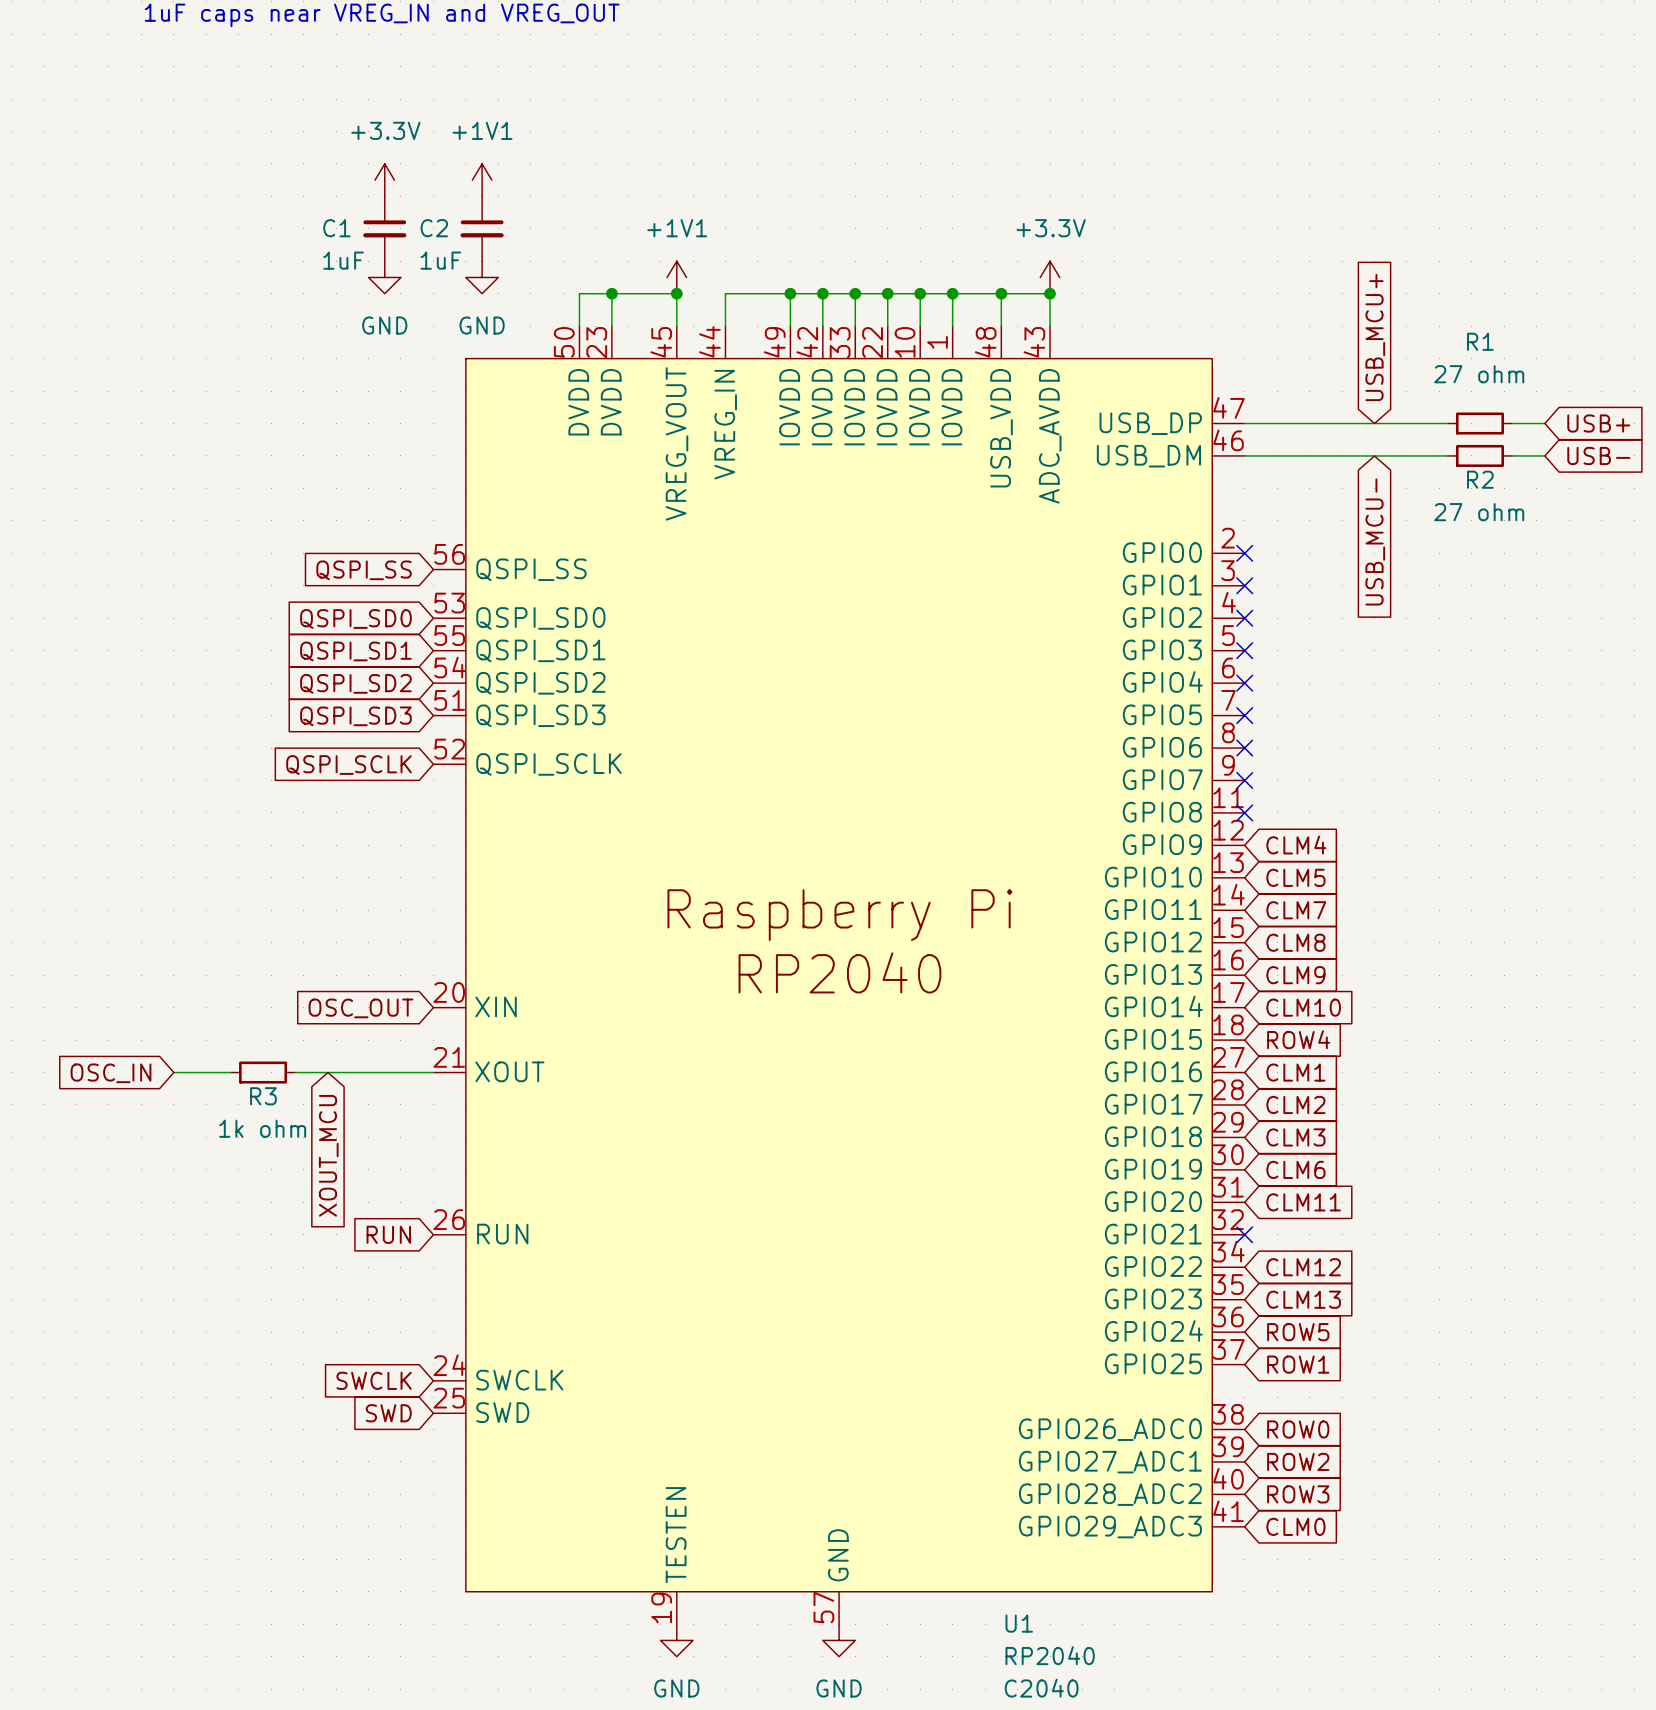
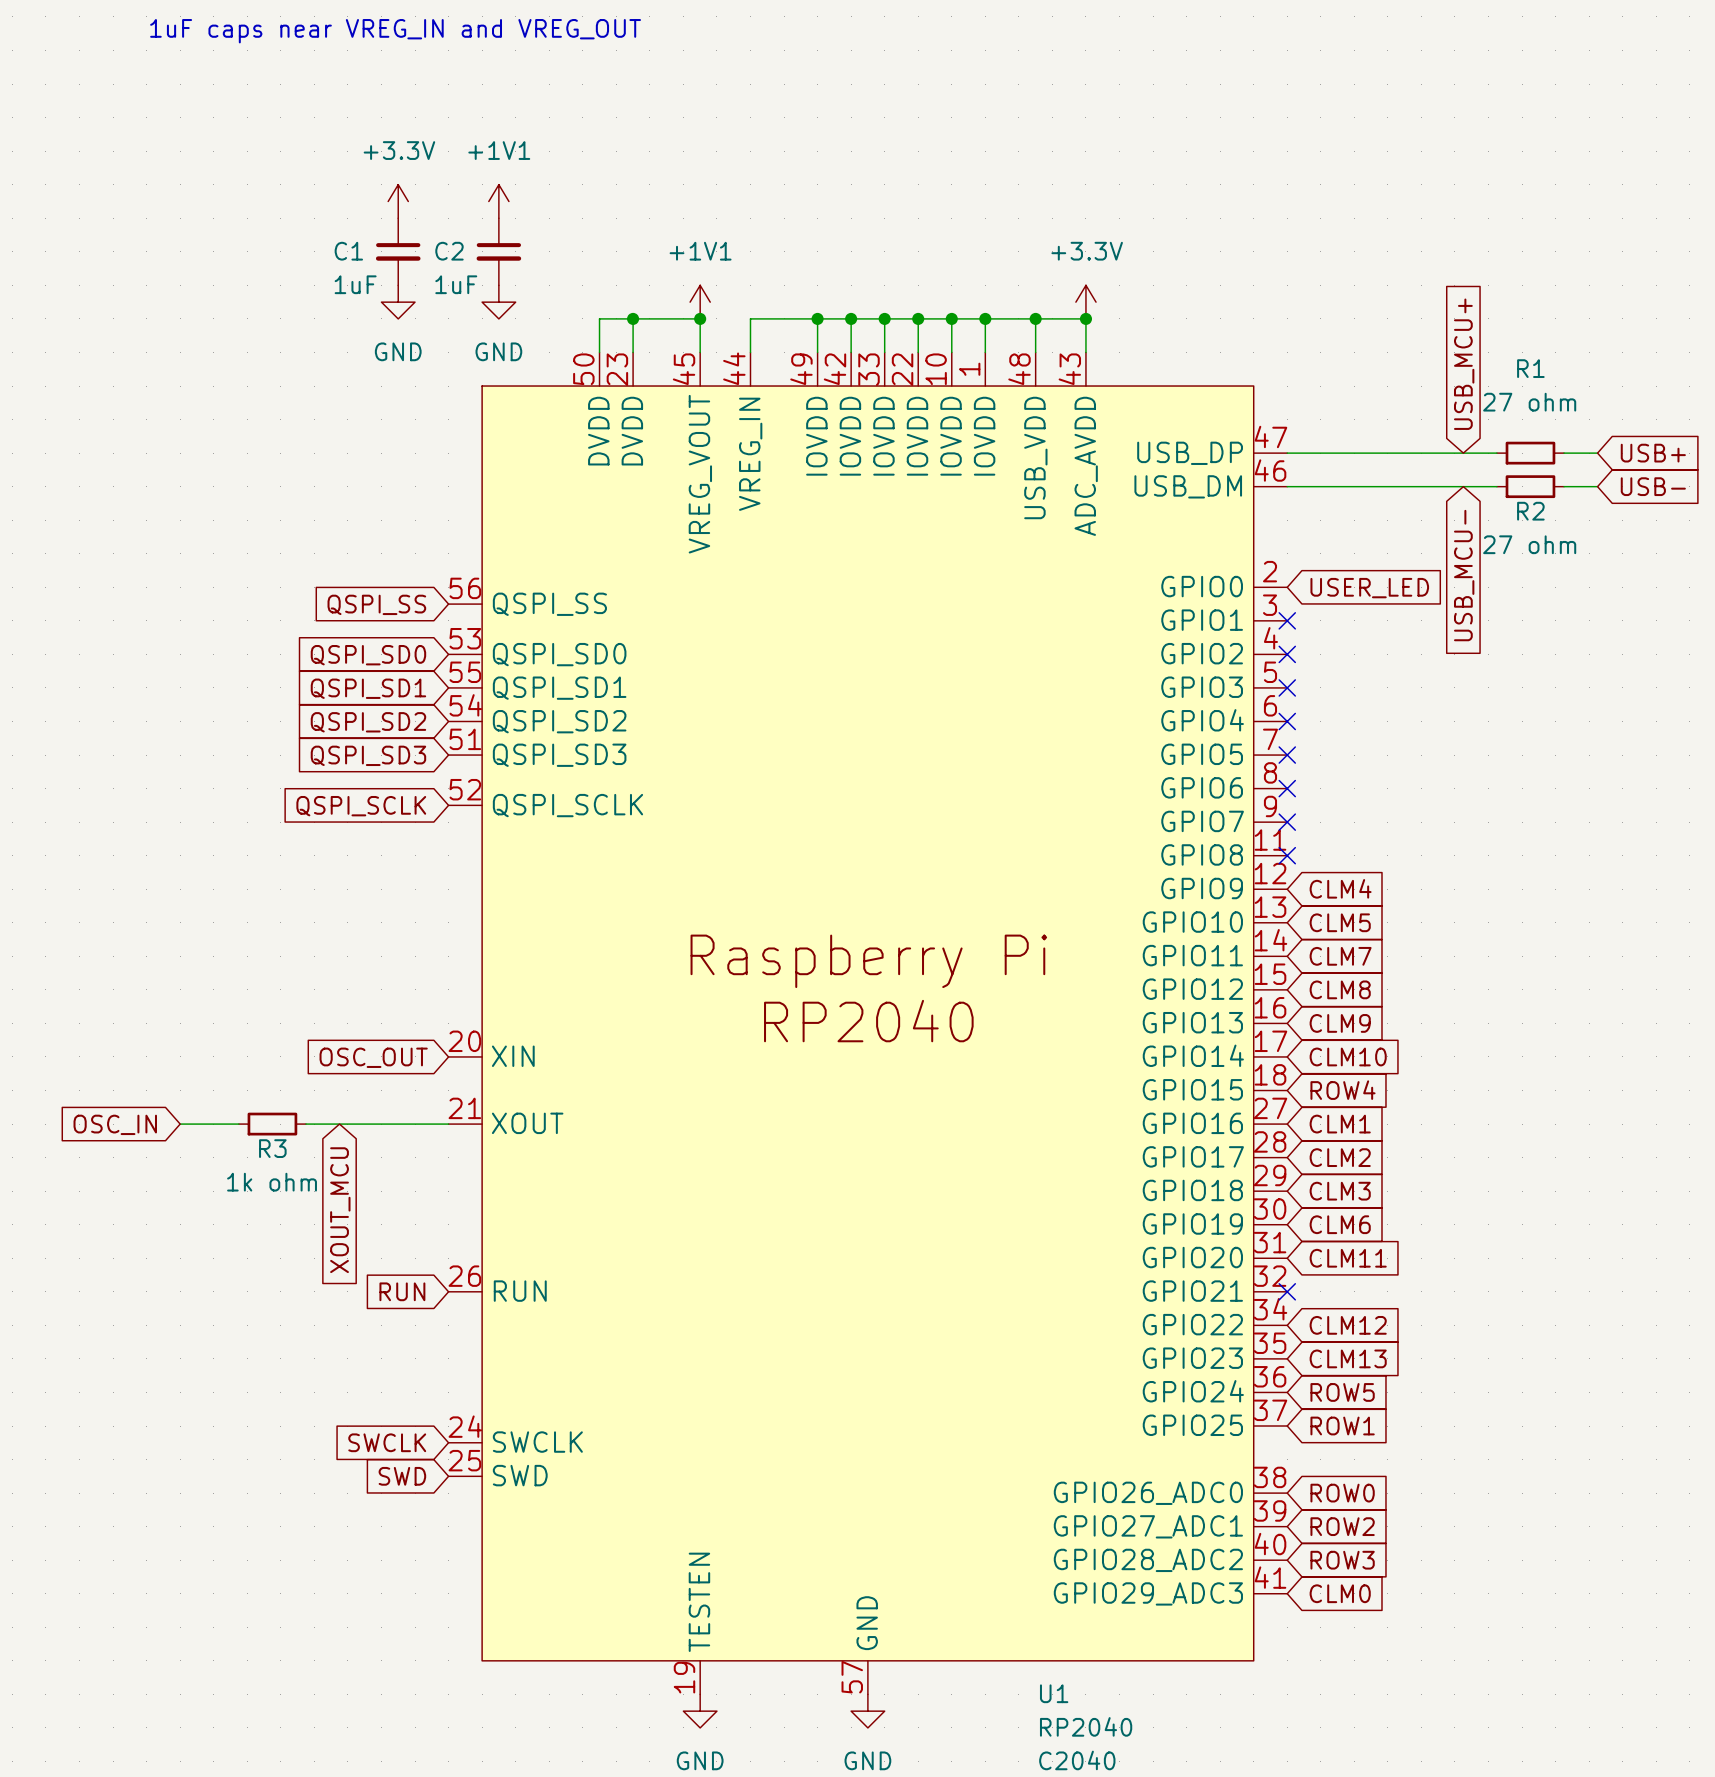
global label position: USB_MCU+ (1375, 337) -> USB_MCU+ (1464, 364)
global label position: USB_MCU- (1375, 541) -> USB_MCU- (1464, 575)
no-connect mark: (1244, 553) -> none
global label: none -> USER_LED (1369, 588)

